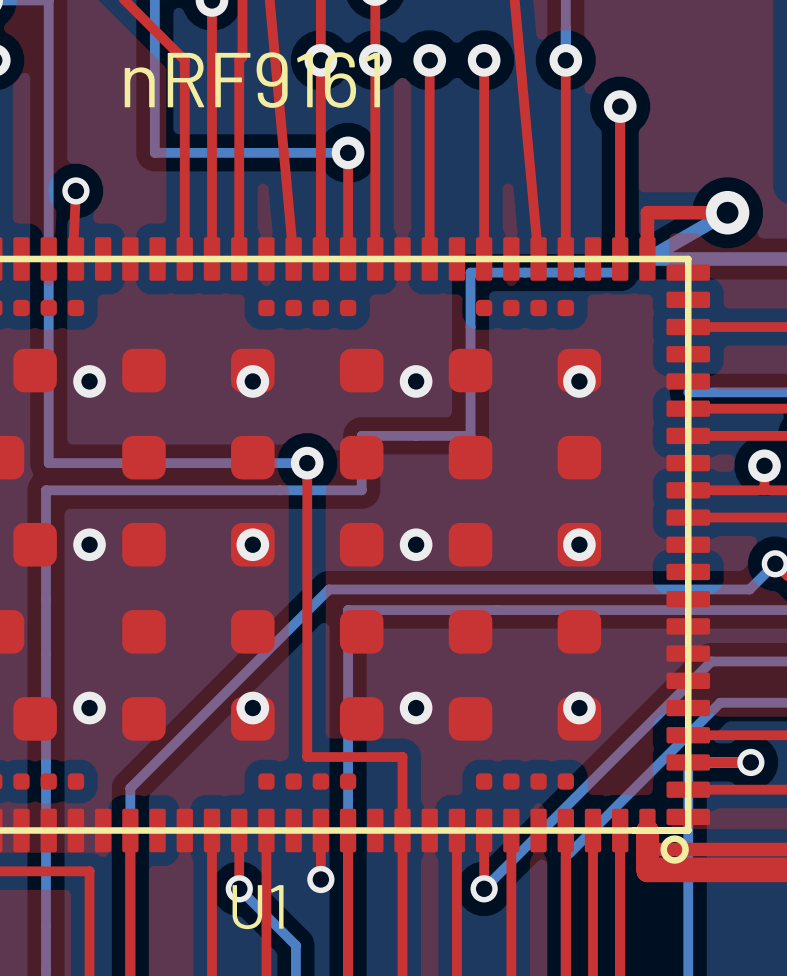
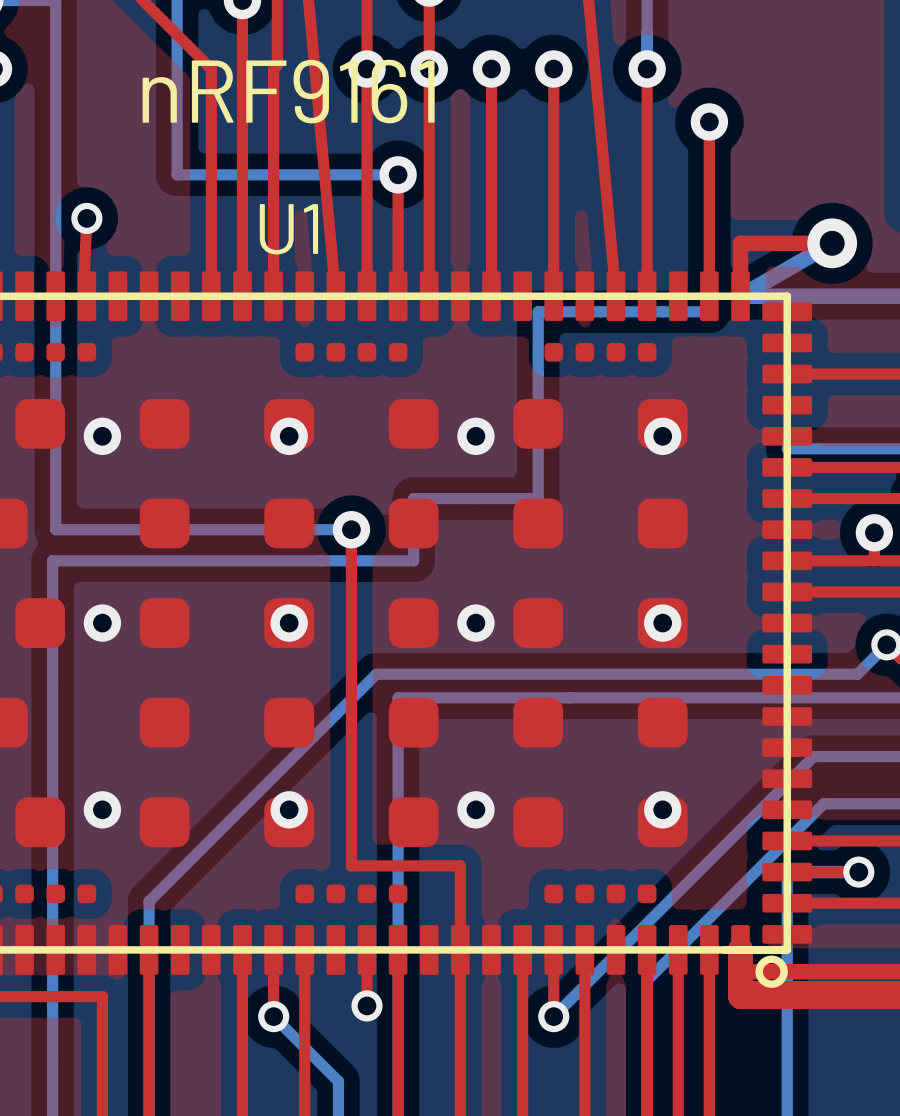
U1 name position: U1 (258, 907) -> U1 (288, 229)

